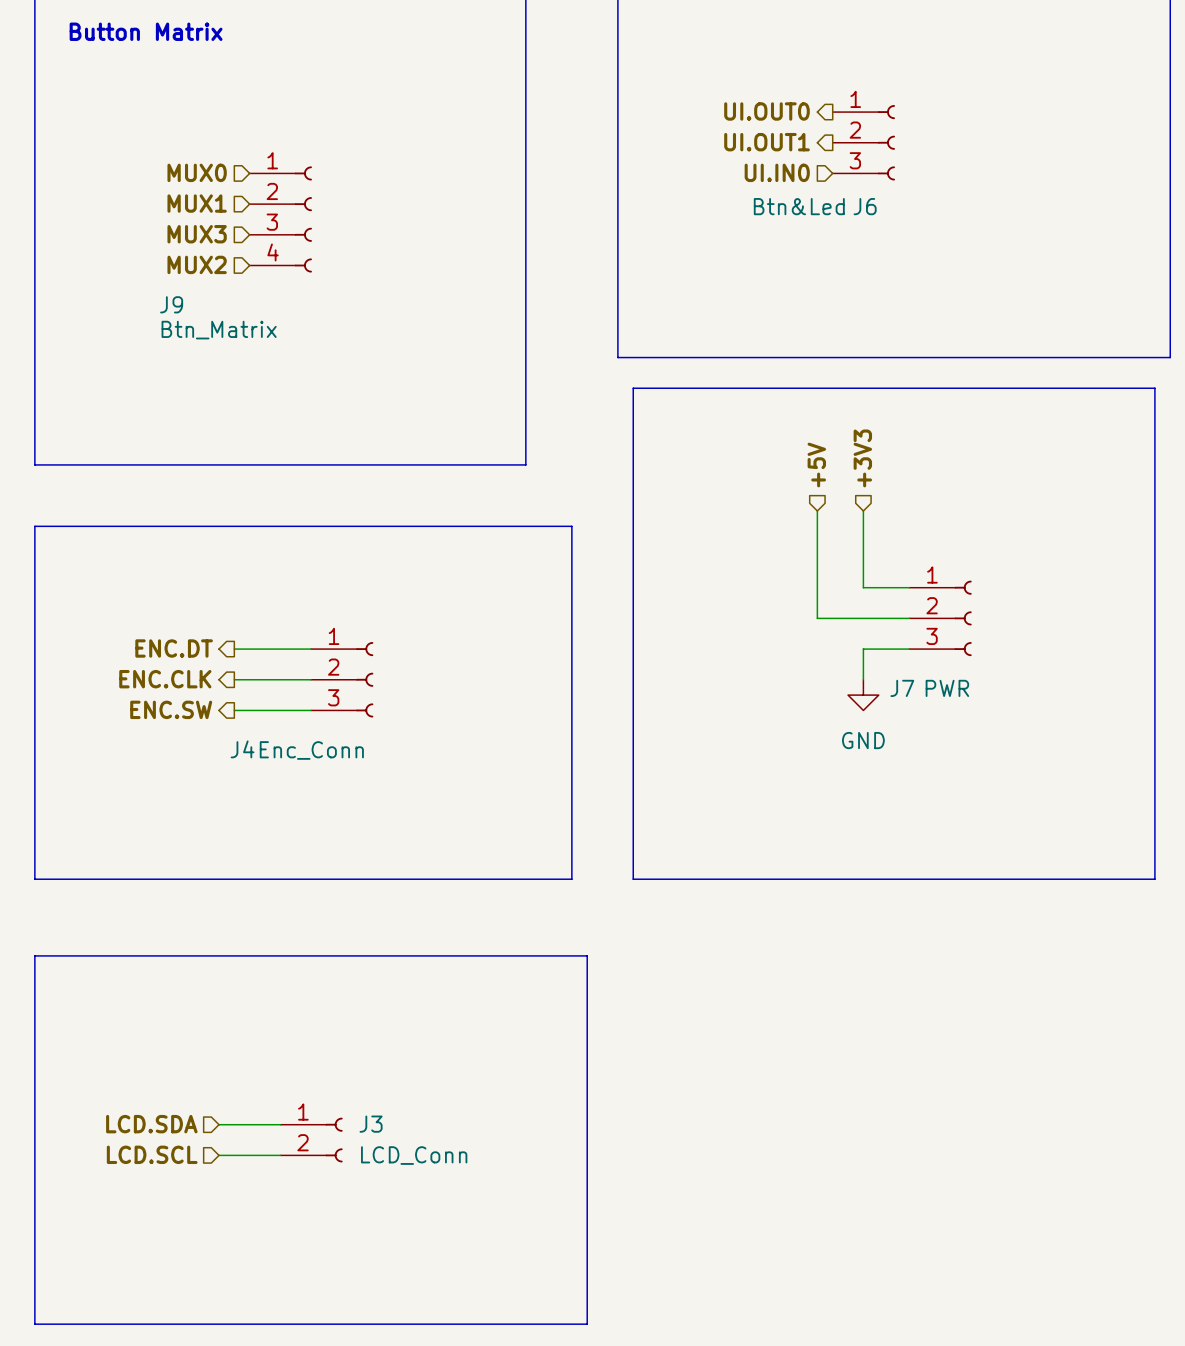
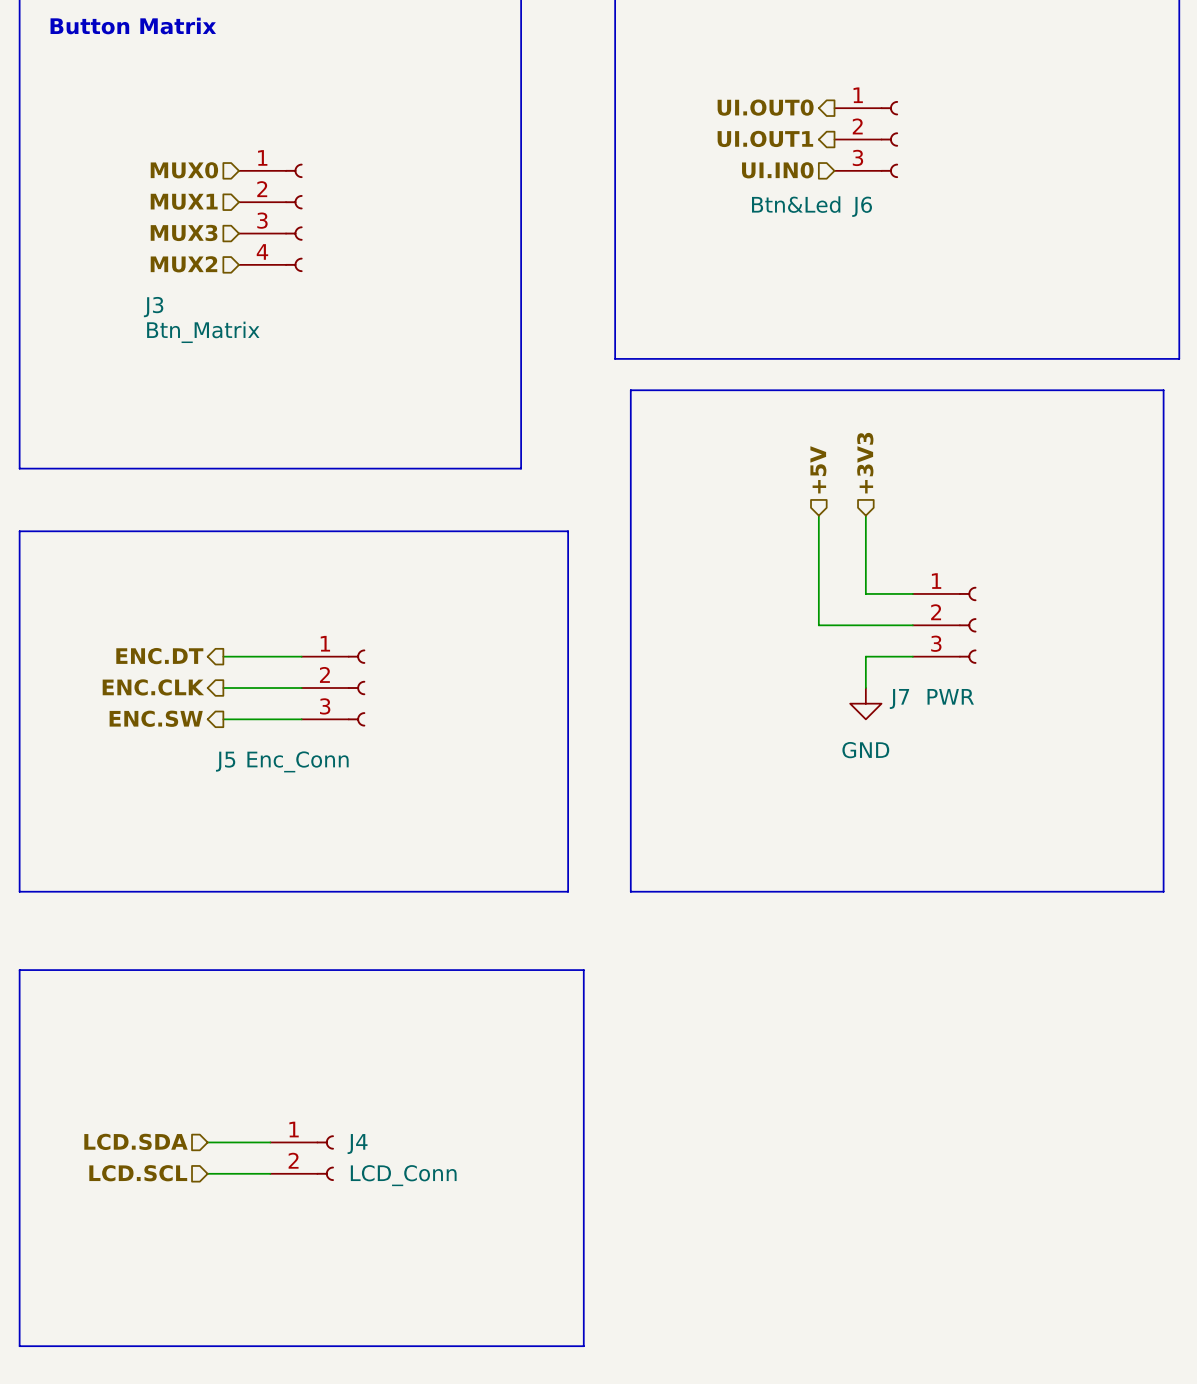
J9 name: J9 (171, 304) -> J3 (153, 307)
J4 name: J4 (242, 749) -> J5 (225, 761)
J3 name: J3 (371, 1124) -> J4 (357, 1144)

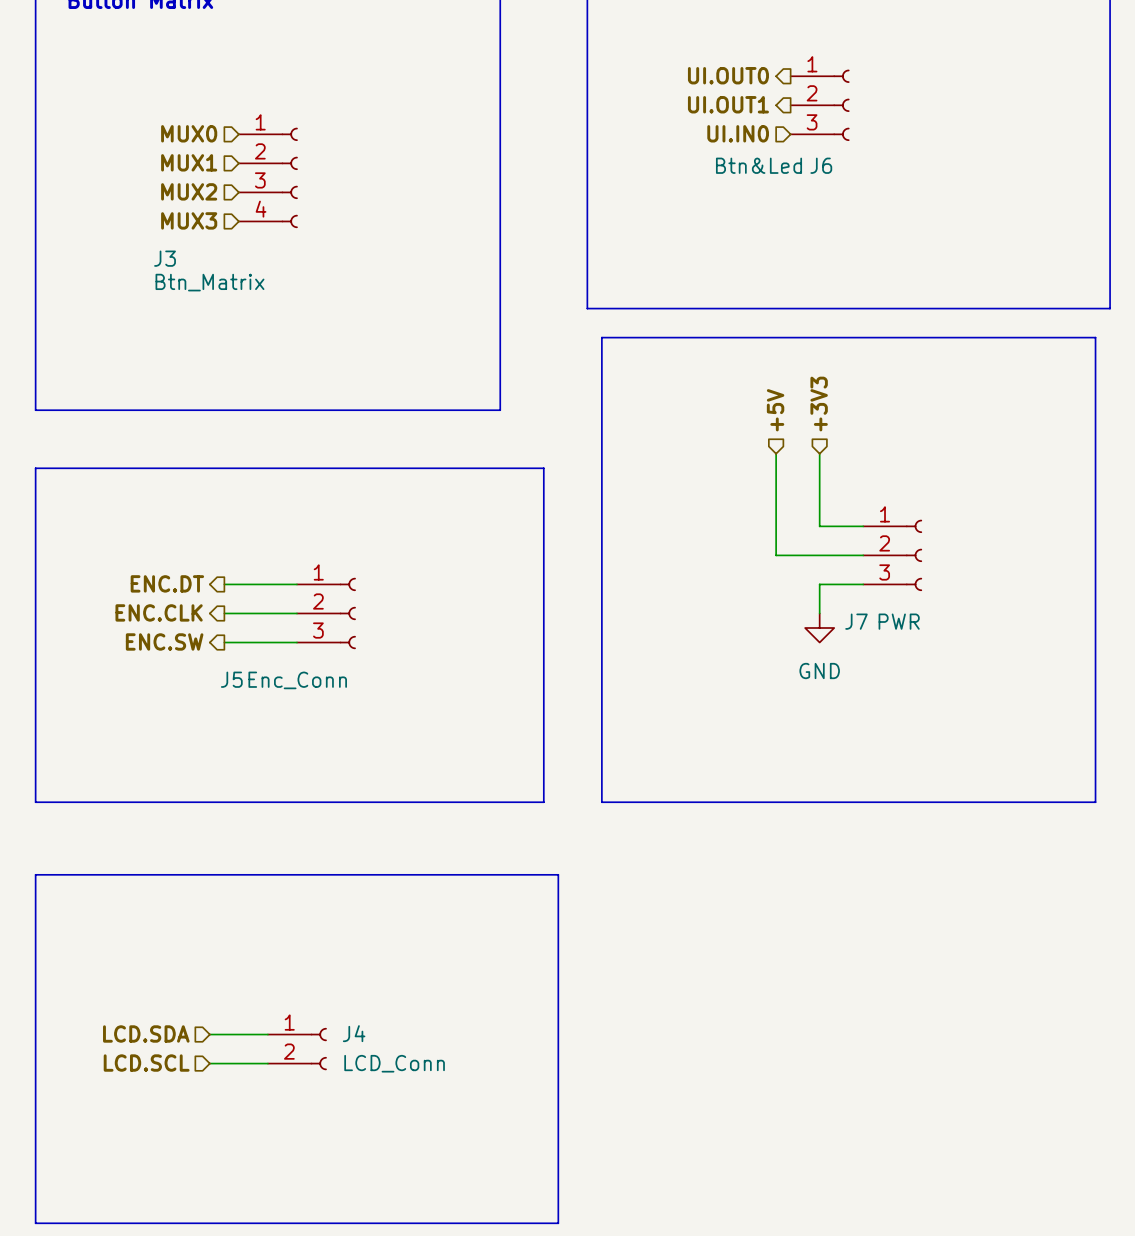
hierarchical label: MUX3 (184, 232) -> MUX2 (189, 191)
hierarchical label: MUX2 (183, 264) -> MUX3 (189, 220)

